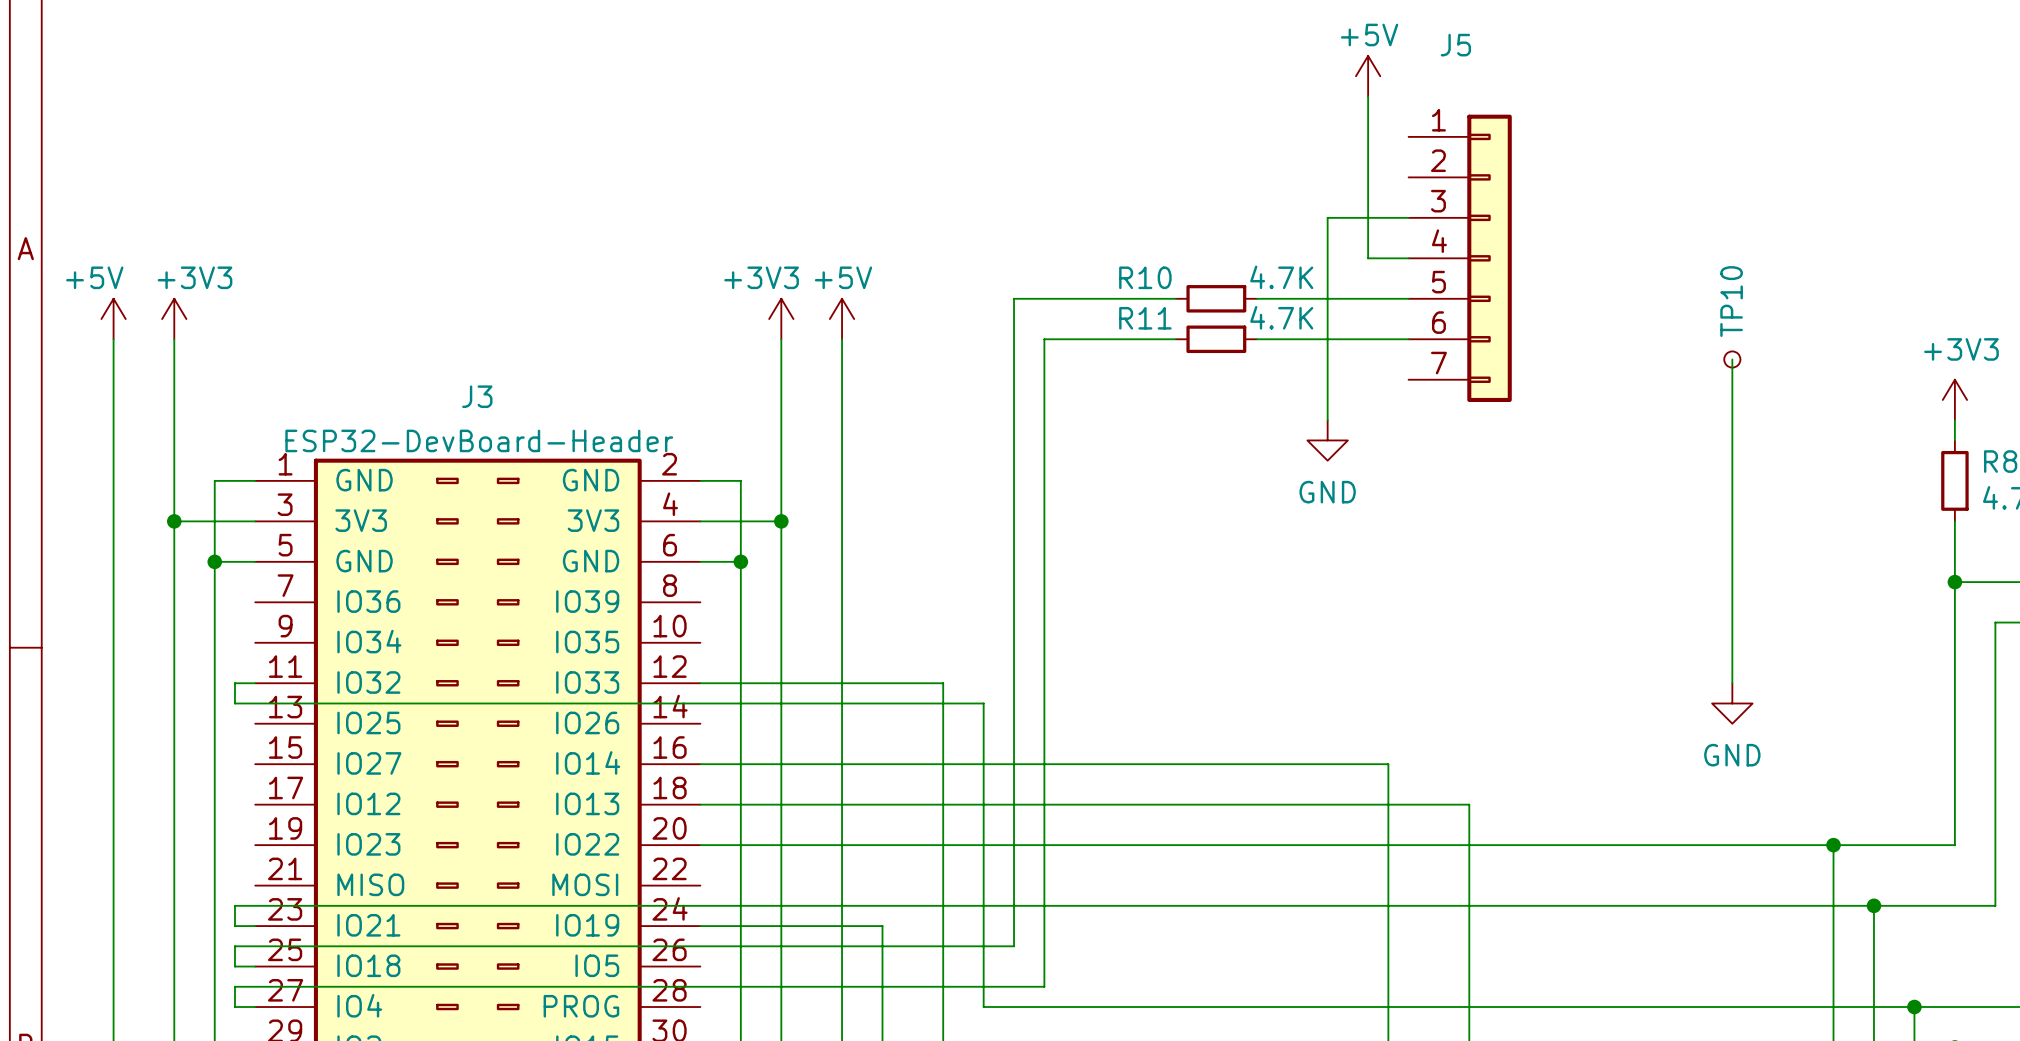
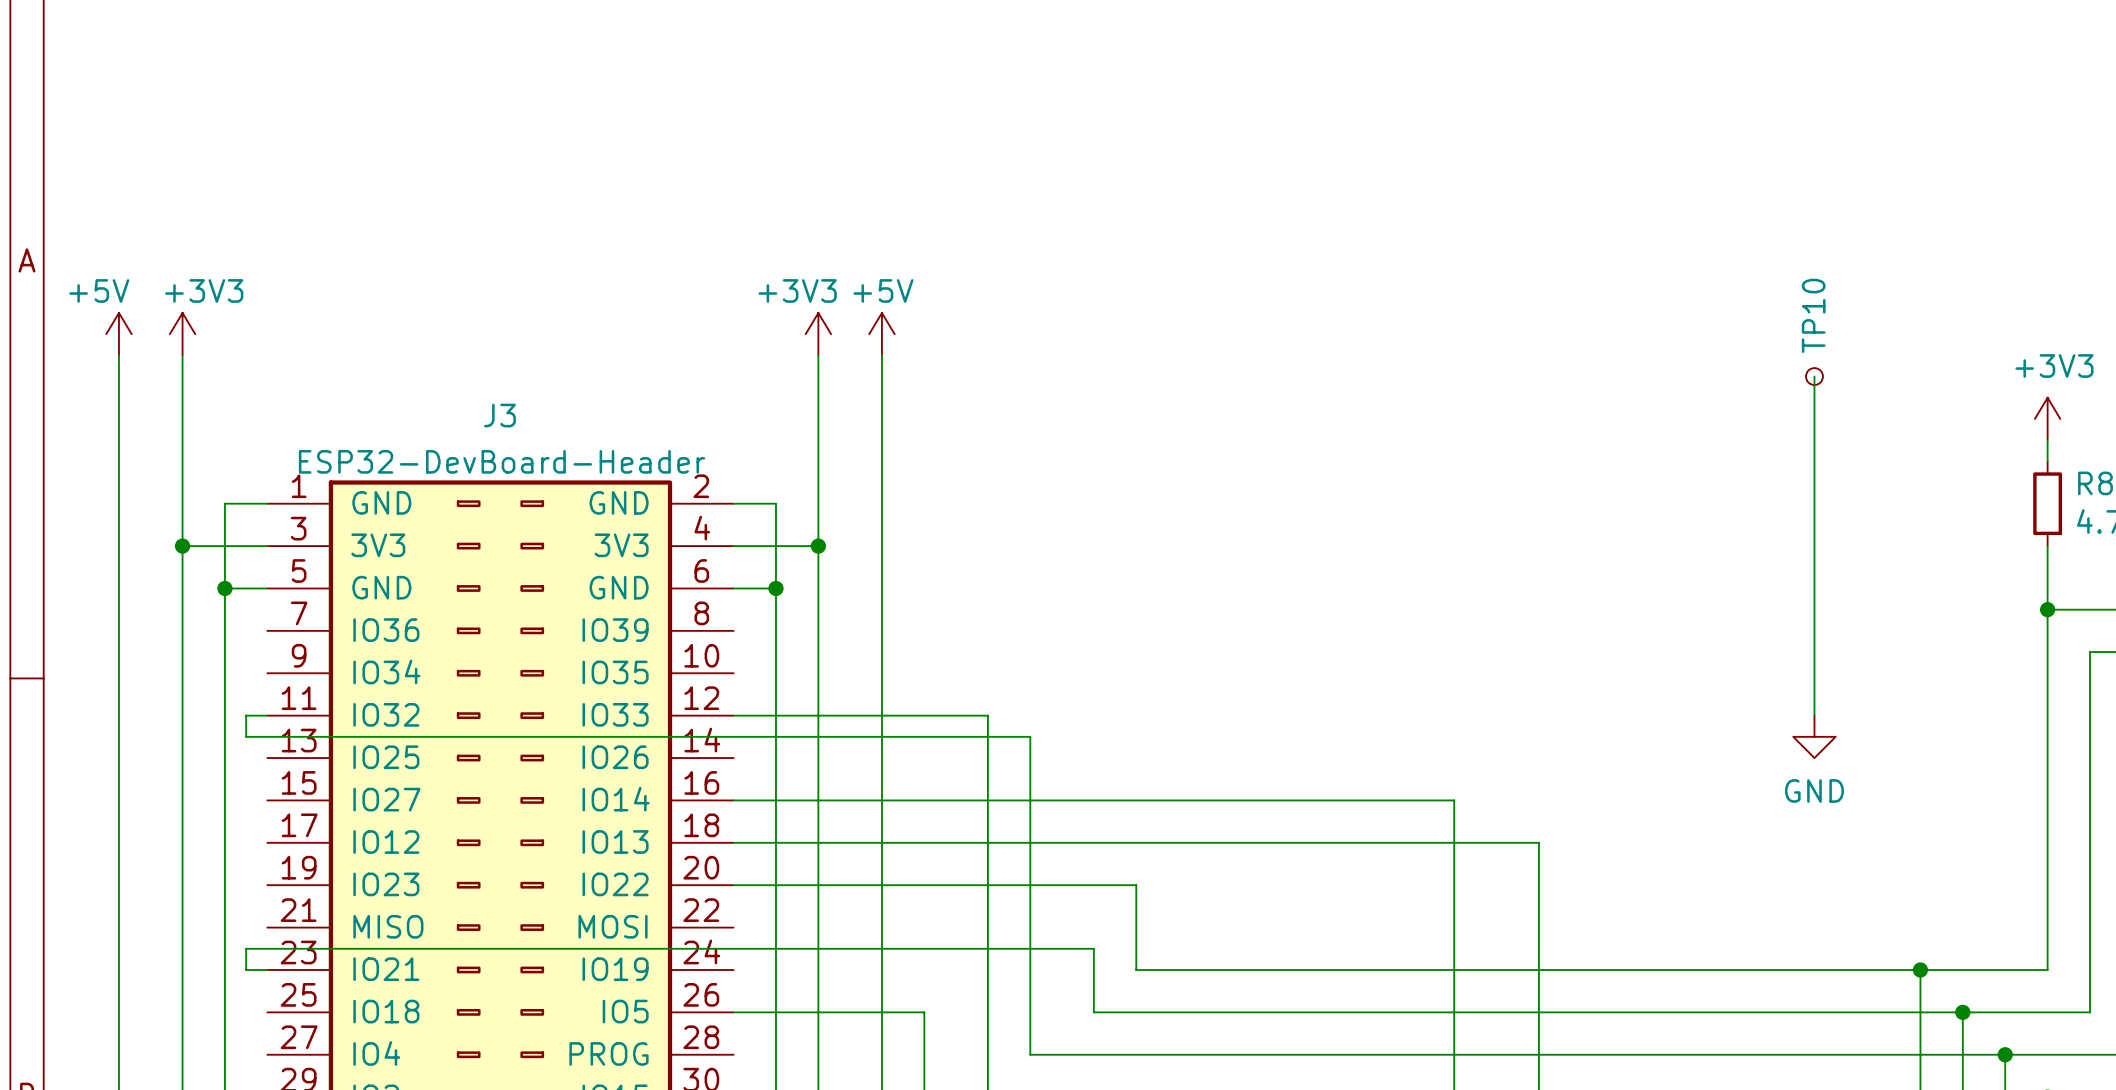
power symbol: +5V (1368, 76) -> none
wire: (1368, 96) (1368, 258) (1408, 258) -> none
wire: (1408, 217) (1327, 217) (1327, 420) -> none
J5: (1460, 258) -> none
wire: (1175, 298) (1014, 298) (1014, 946) (234, 946) (234, 966) (255, 966) -> none
R10: 4.7K (1216, 298) -> none
wire: (1256, 298) (1408, 298) -> none
wire: (1175, 339) (1044, 339) (1044, 905) (1995, 905) -> (1093, 1012) (2089, 1012) (2089, 948)
R11: 4.7K (1216, 339) -> none
wire: (1256, 339) (1408, 339) -> none
power symbol: GND (1327, 440) -> none
wire: (1084, 845) (1954, 845) -> (1136, 885) (1136, 969) (2047, 969) (2047, 885)
wire: (1833, 845) (1833, 926) -> none
junction: (1833, 845) -> none
wire: (1873, 905) (1873, 966) -> none
junction: (1873, 905) -> none
wire: (700, 926) (882, 926) (882, 966) -> (733, 1012) (924, 1012)
junction: none -> (1920, 969)
wire: (1044, 966) (1044, 986) (234, 986) (234, 1007) (255, 1007) -> none
junction: none -> (1962, 1012)

